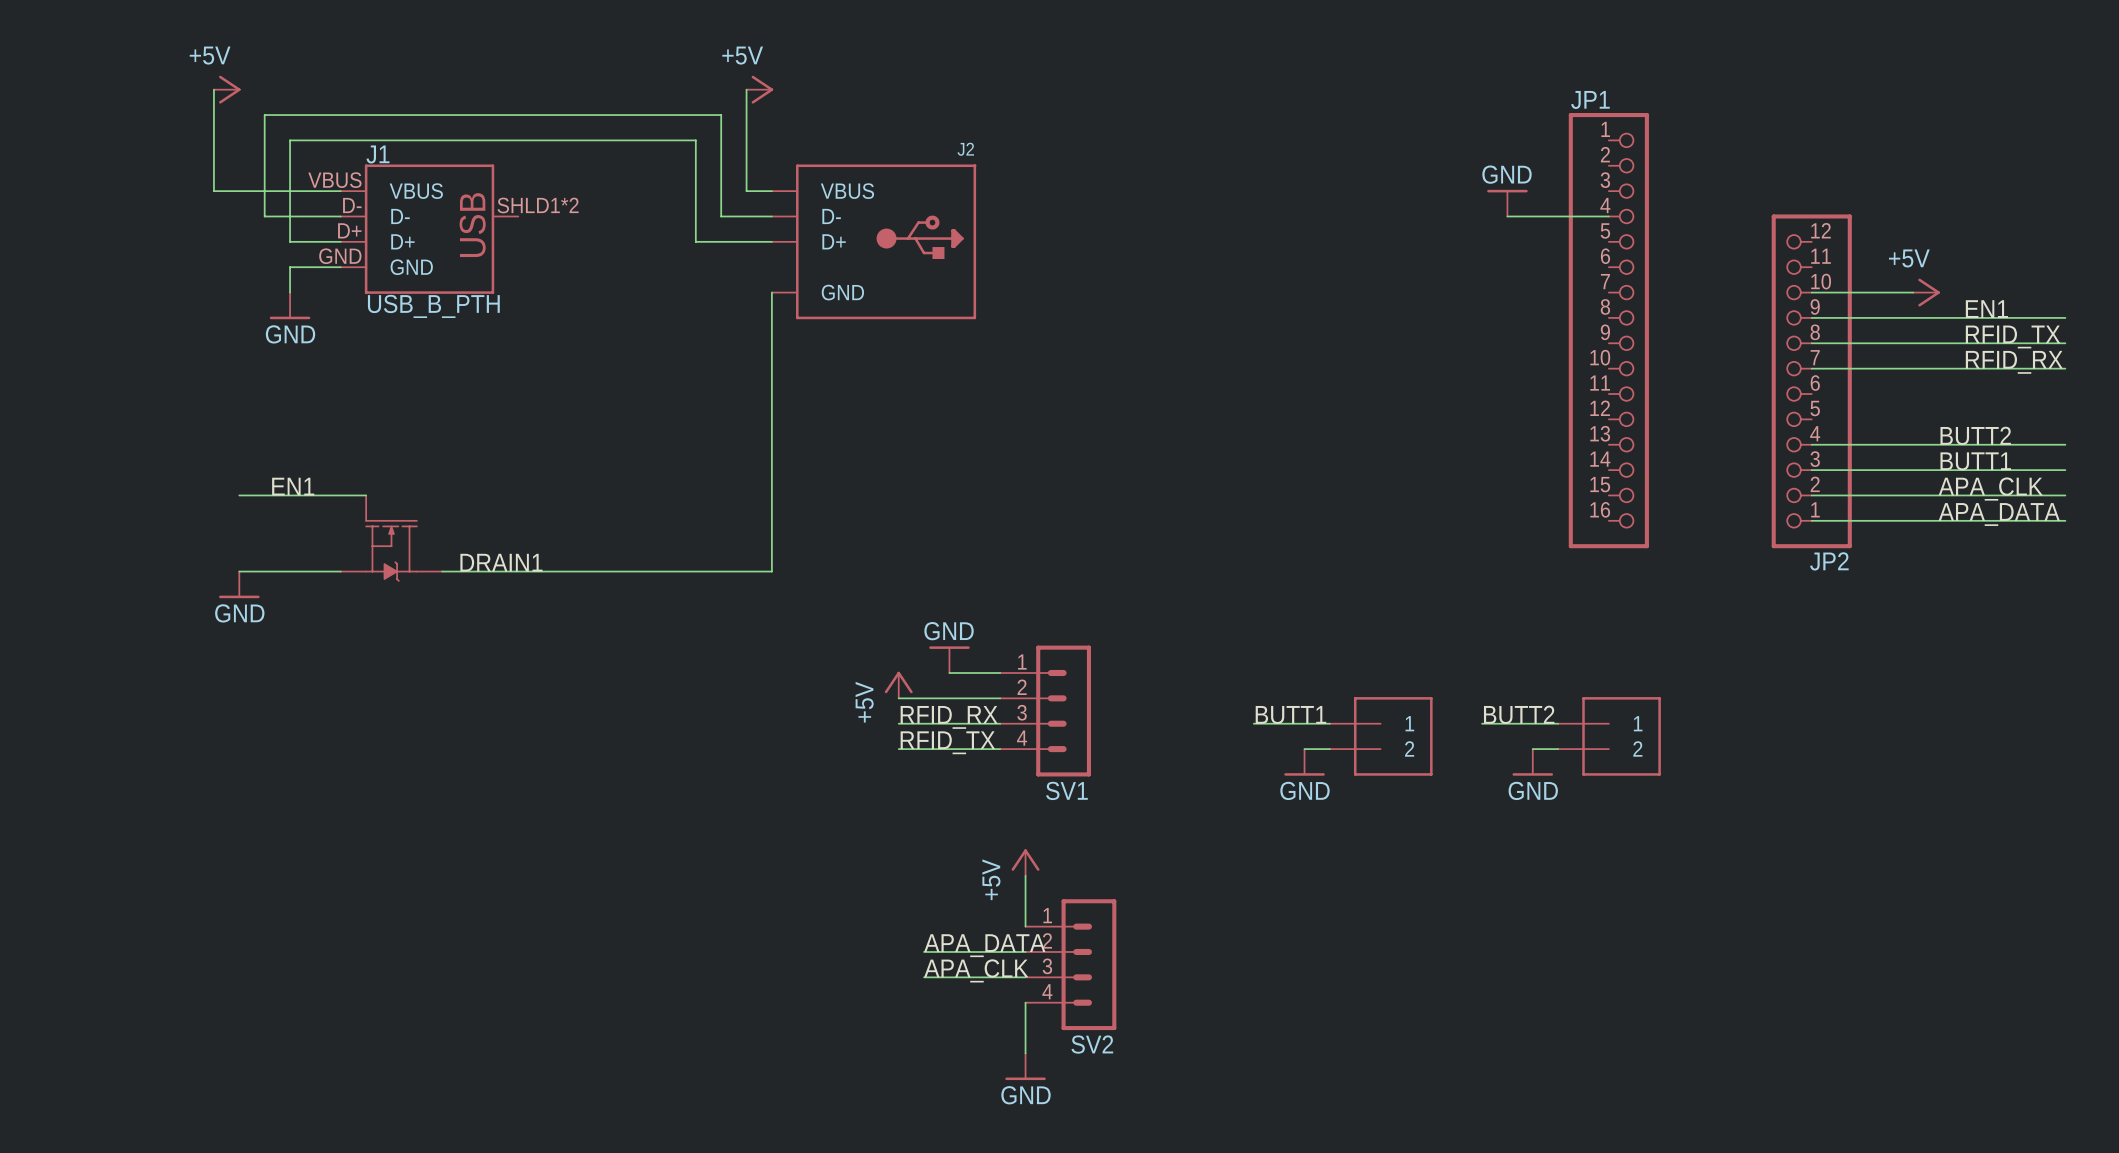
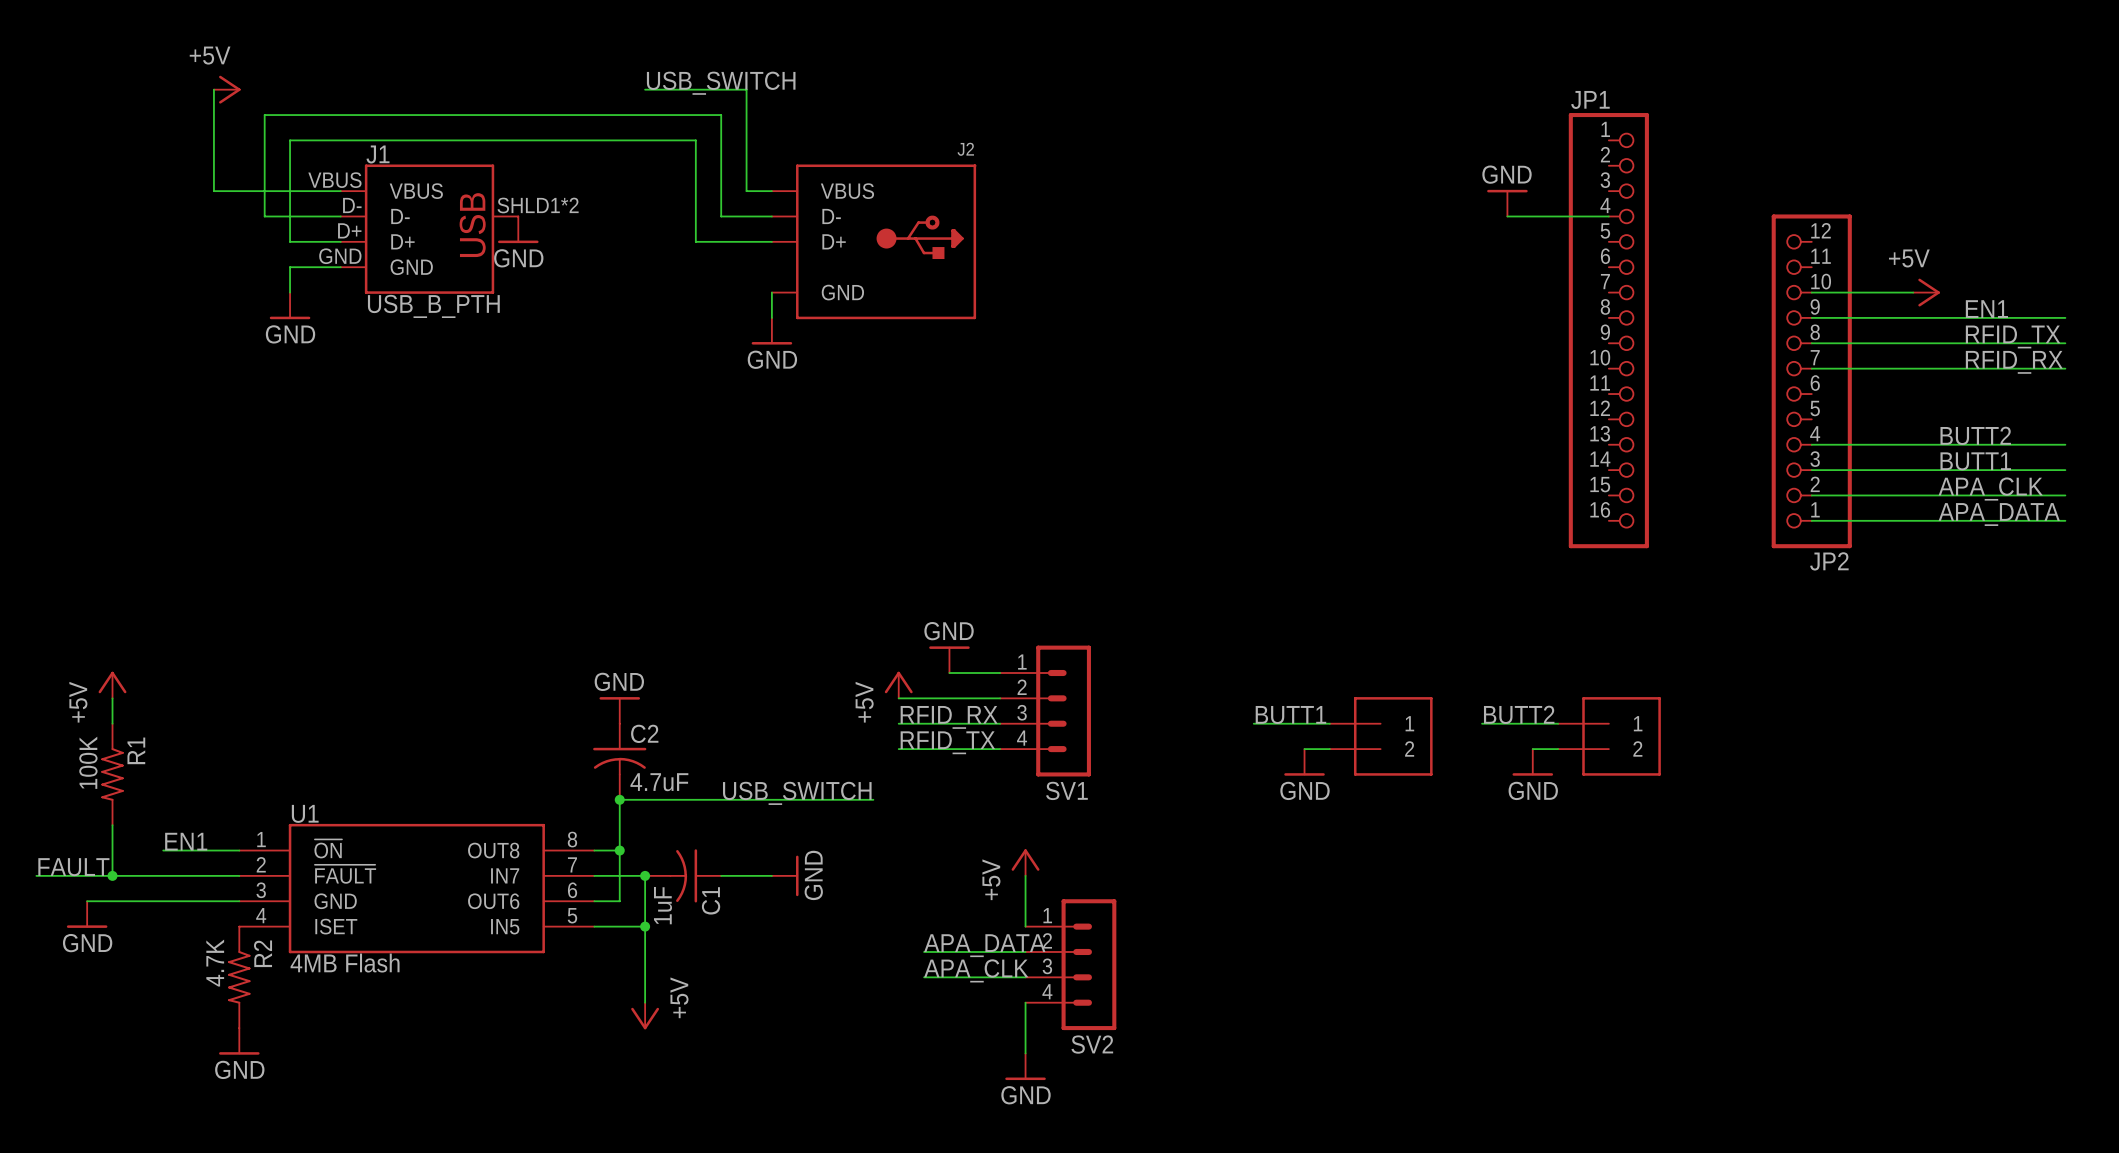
label: none -> USB_SWITCH (721, 83)
wire: none -> (645, 89) (746, 89)
power symbol: +5V (759, 89) -> none
power symbol: none -> GND (518, 229)
wire: (771, 317) (771, 571) (442, 571) -> none
power symbol: none -> GND (771, 331)
label: EN1 (293, 486) -> none
wire: (239, 495) (366, 495) -> none
part: (391, 538) -> none
label: DRAIN1 (501, 562) -> none
wire: (239, 571) (340, 571) -> none
power symbol: GND (239, 584) -> none
power symbol: none -> +5V (112, 685)
wire: none -> (112, 698) (112, 723)
power symbol: none -> GND (619, 710)
C2: none -> 4.7uF (619, 761)
R1: none -> 100K (112, 774)
label: none -> USB_SWITCH (797, 793)
junction: none -> (619, 799)
wire: none -> (873, 799) (619, 799) (619, 901) (594, 901)
wire: none -> (112, 825) (112, 875)
label: none -> EN1 (186, 841)
wire: none -> (163, 850) (239, 850)
wire: none -> (594, 850) (619, 850)
junction: none -> (619, 850)
label: none -> FAULT (73, 867)
wire: none -> (36, 875) (239, 875)
junction: none -> (112, 875)
wire: none -> (594, 875) (645, 875) (645, 1002)
junction: none -> (645, 875)
C1: none -> 1uF (683, 875)
wire: none -> (721, 875) (771, 875)
power symbol: none -> GND (785, 875)
U1: none -> 4MB Flash (416, 888)
wire: none -> (87, 901) (239, 901)
power symbol: none -> GND (87, 914)
wire: none -> (594, 926) (645, 926)
junction: none -> (645, 926)
R2: none -> 4.7K (239, 977)
power symbol: none -> +5V (645, 1016)
power symbol: none -> GND (239, 1041)

